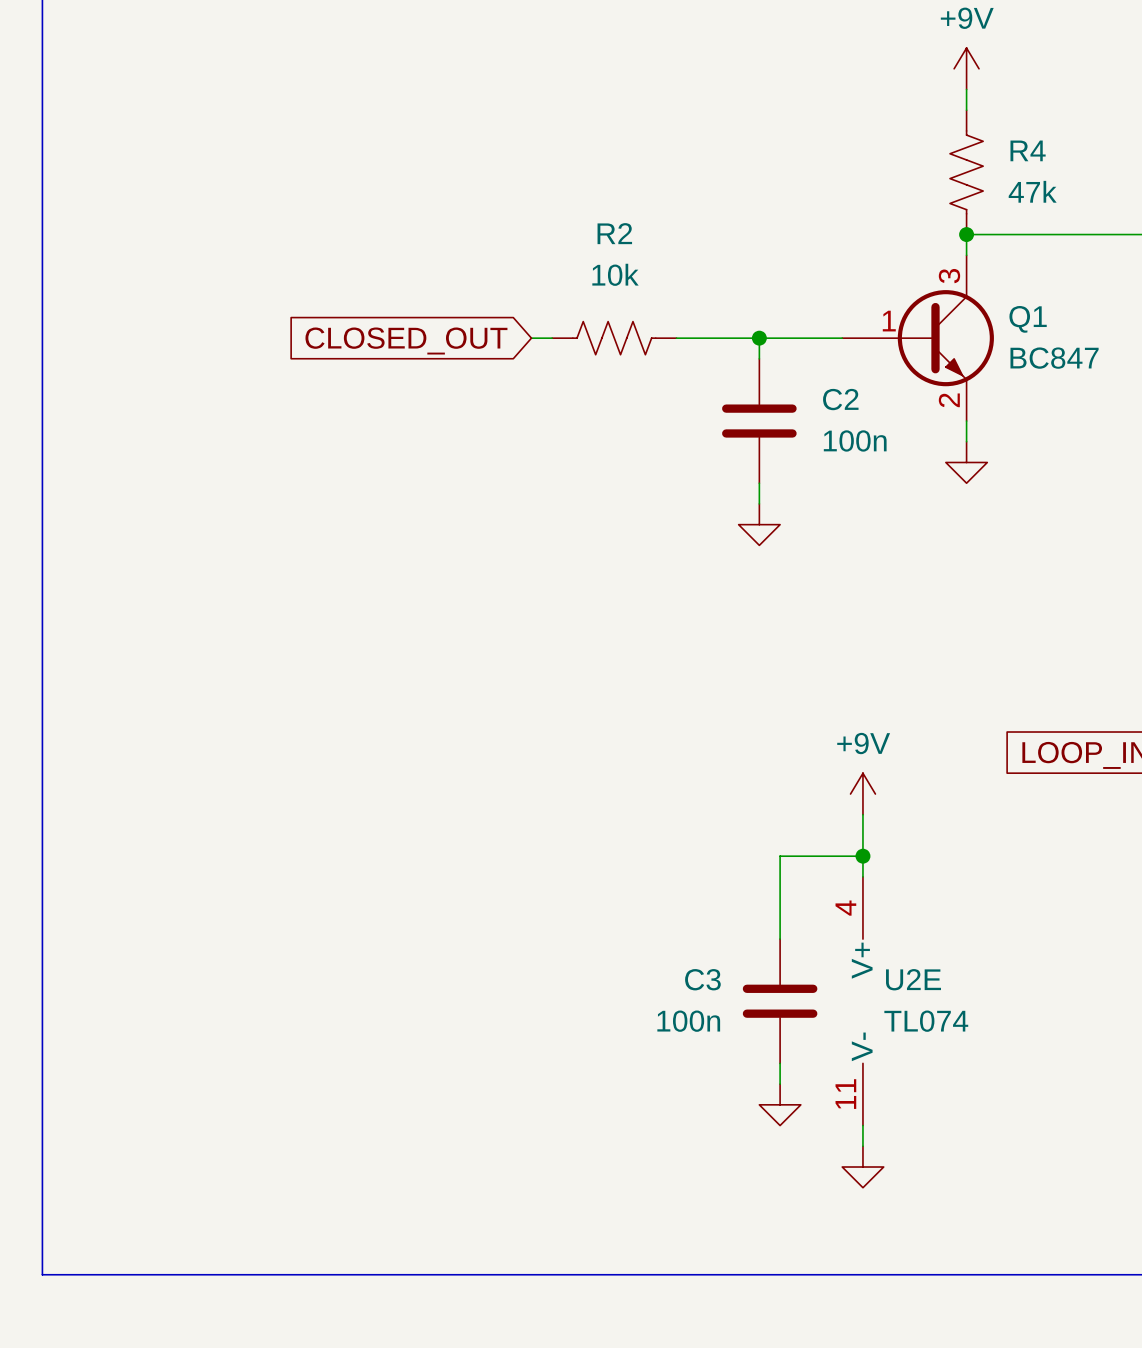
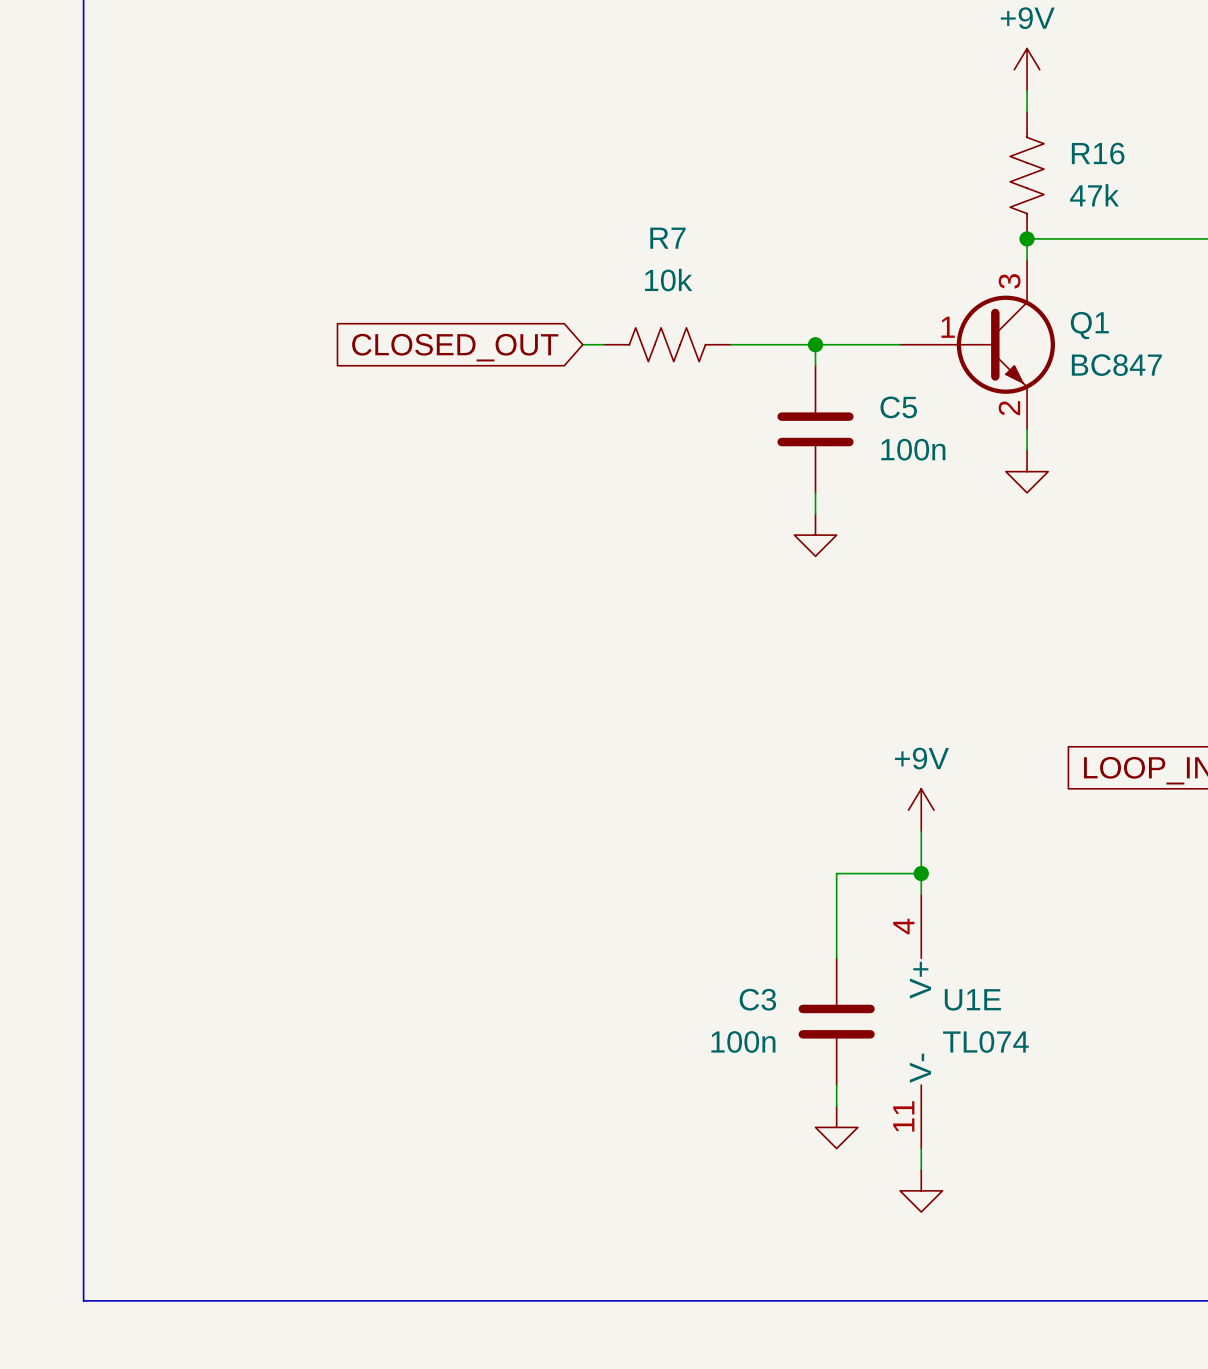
R4 name: R4 (1028, 150) -> R16 (1098, 153)
R2 name: R2 (614, 233) -> R7 (667, 238)
C2 name: C2 (840, 399) -> C5 (898, 407)
U2E name: U2E (913, 979) -> U1E (972, 999)

